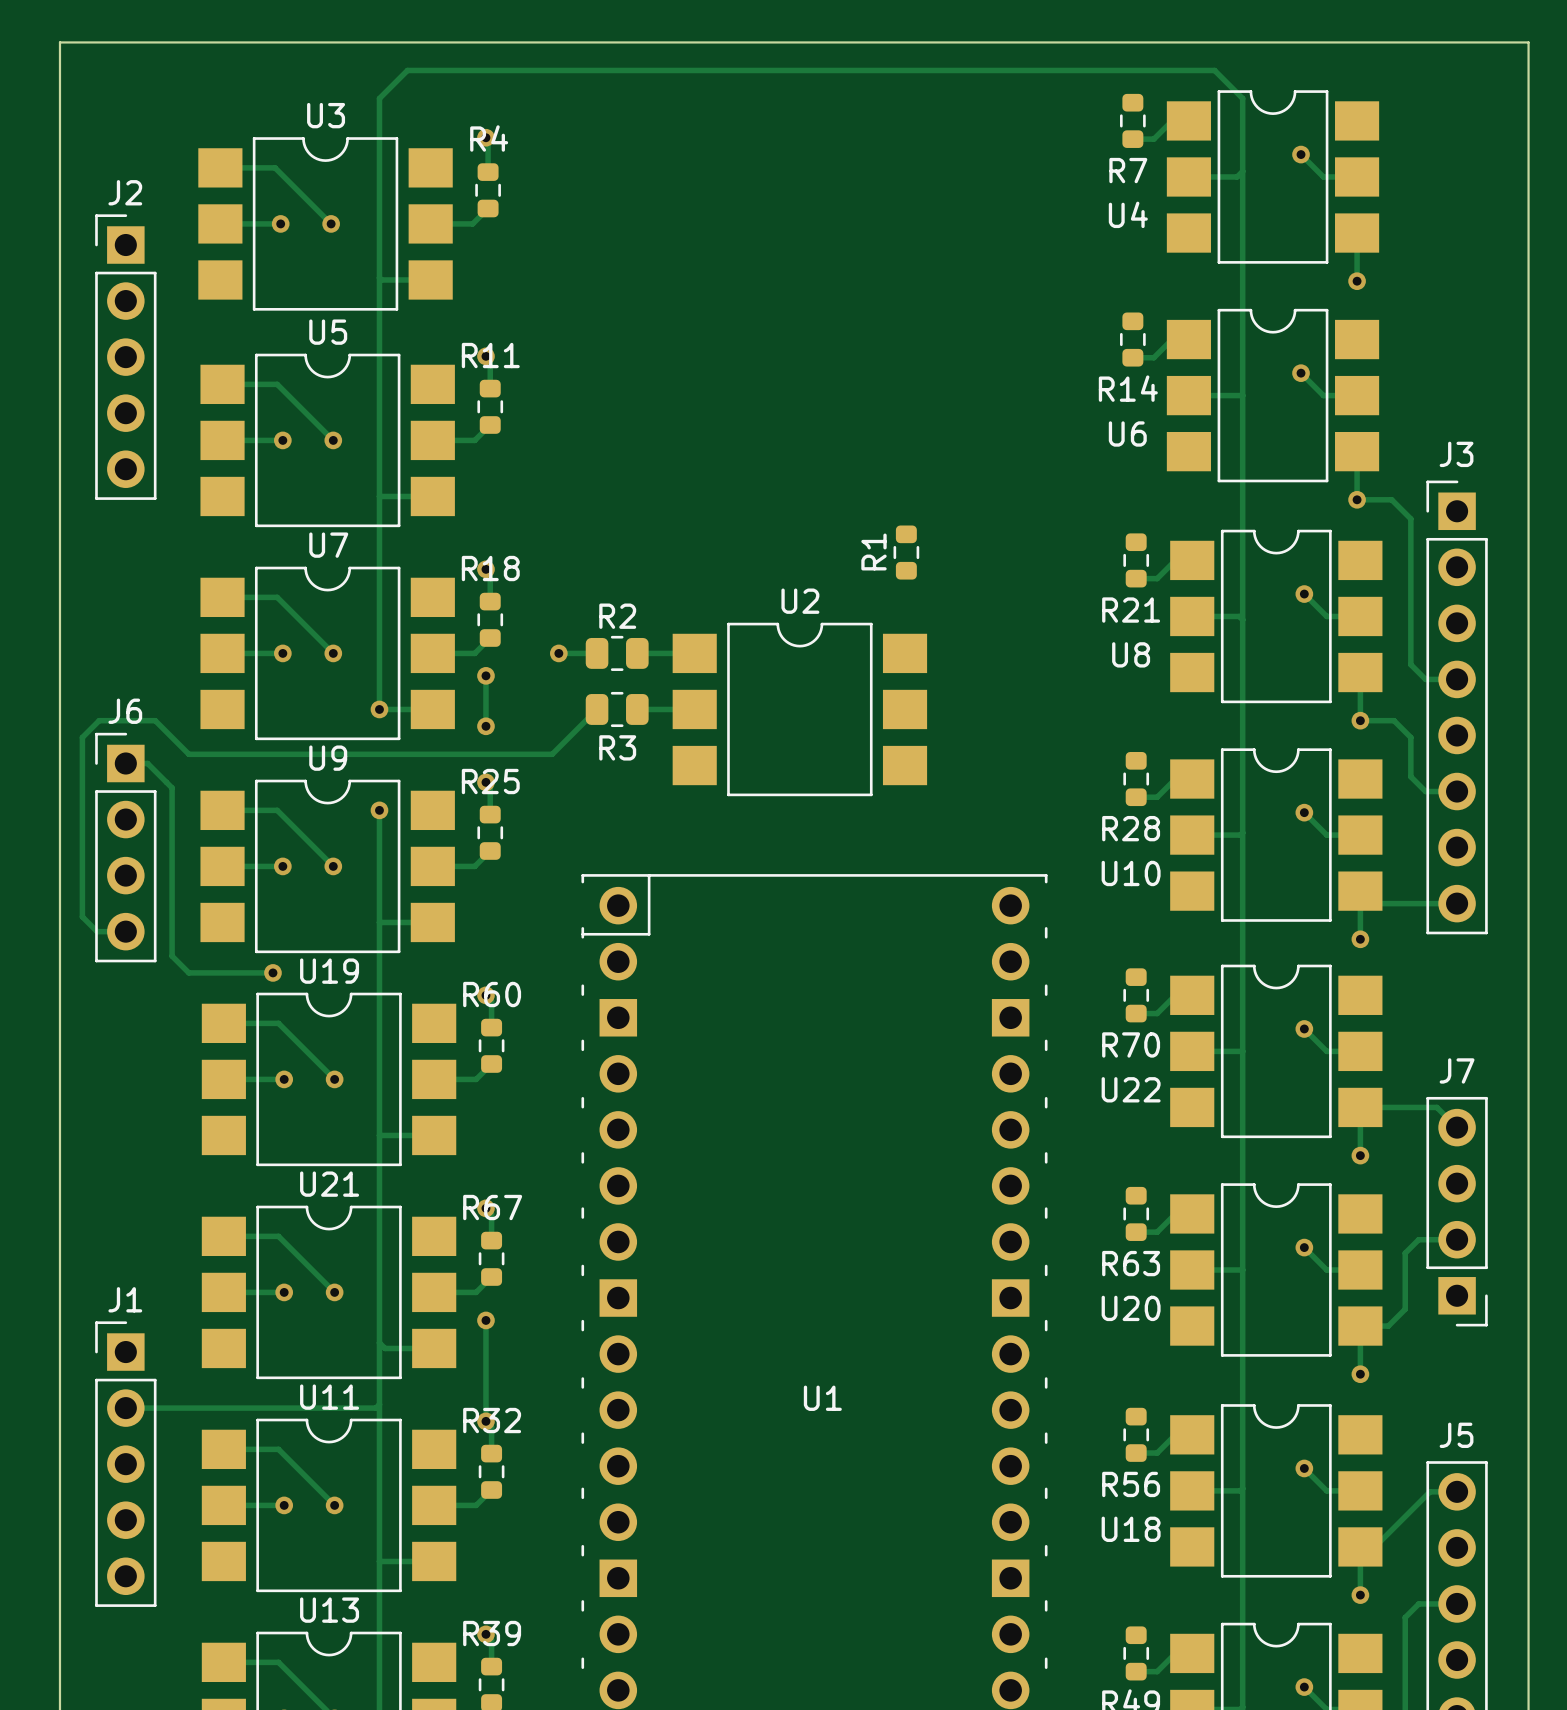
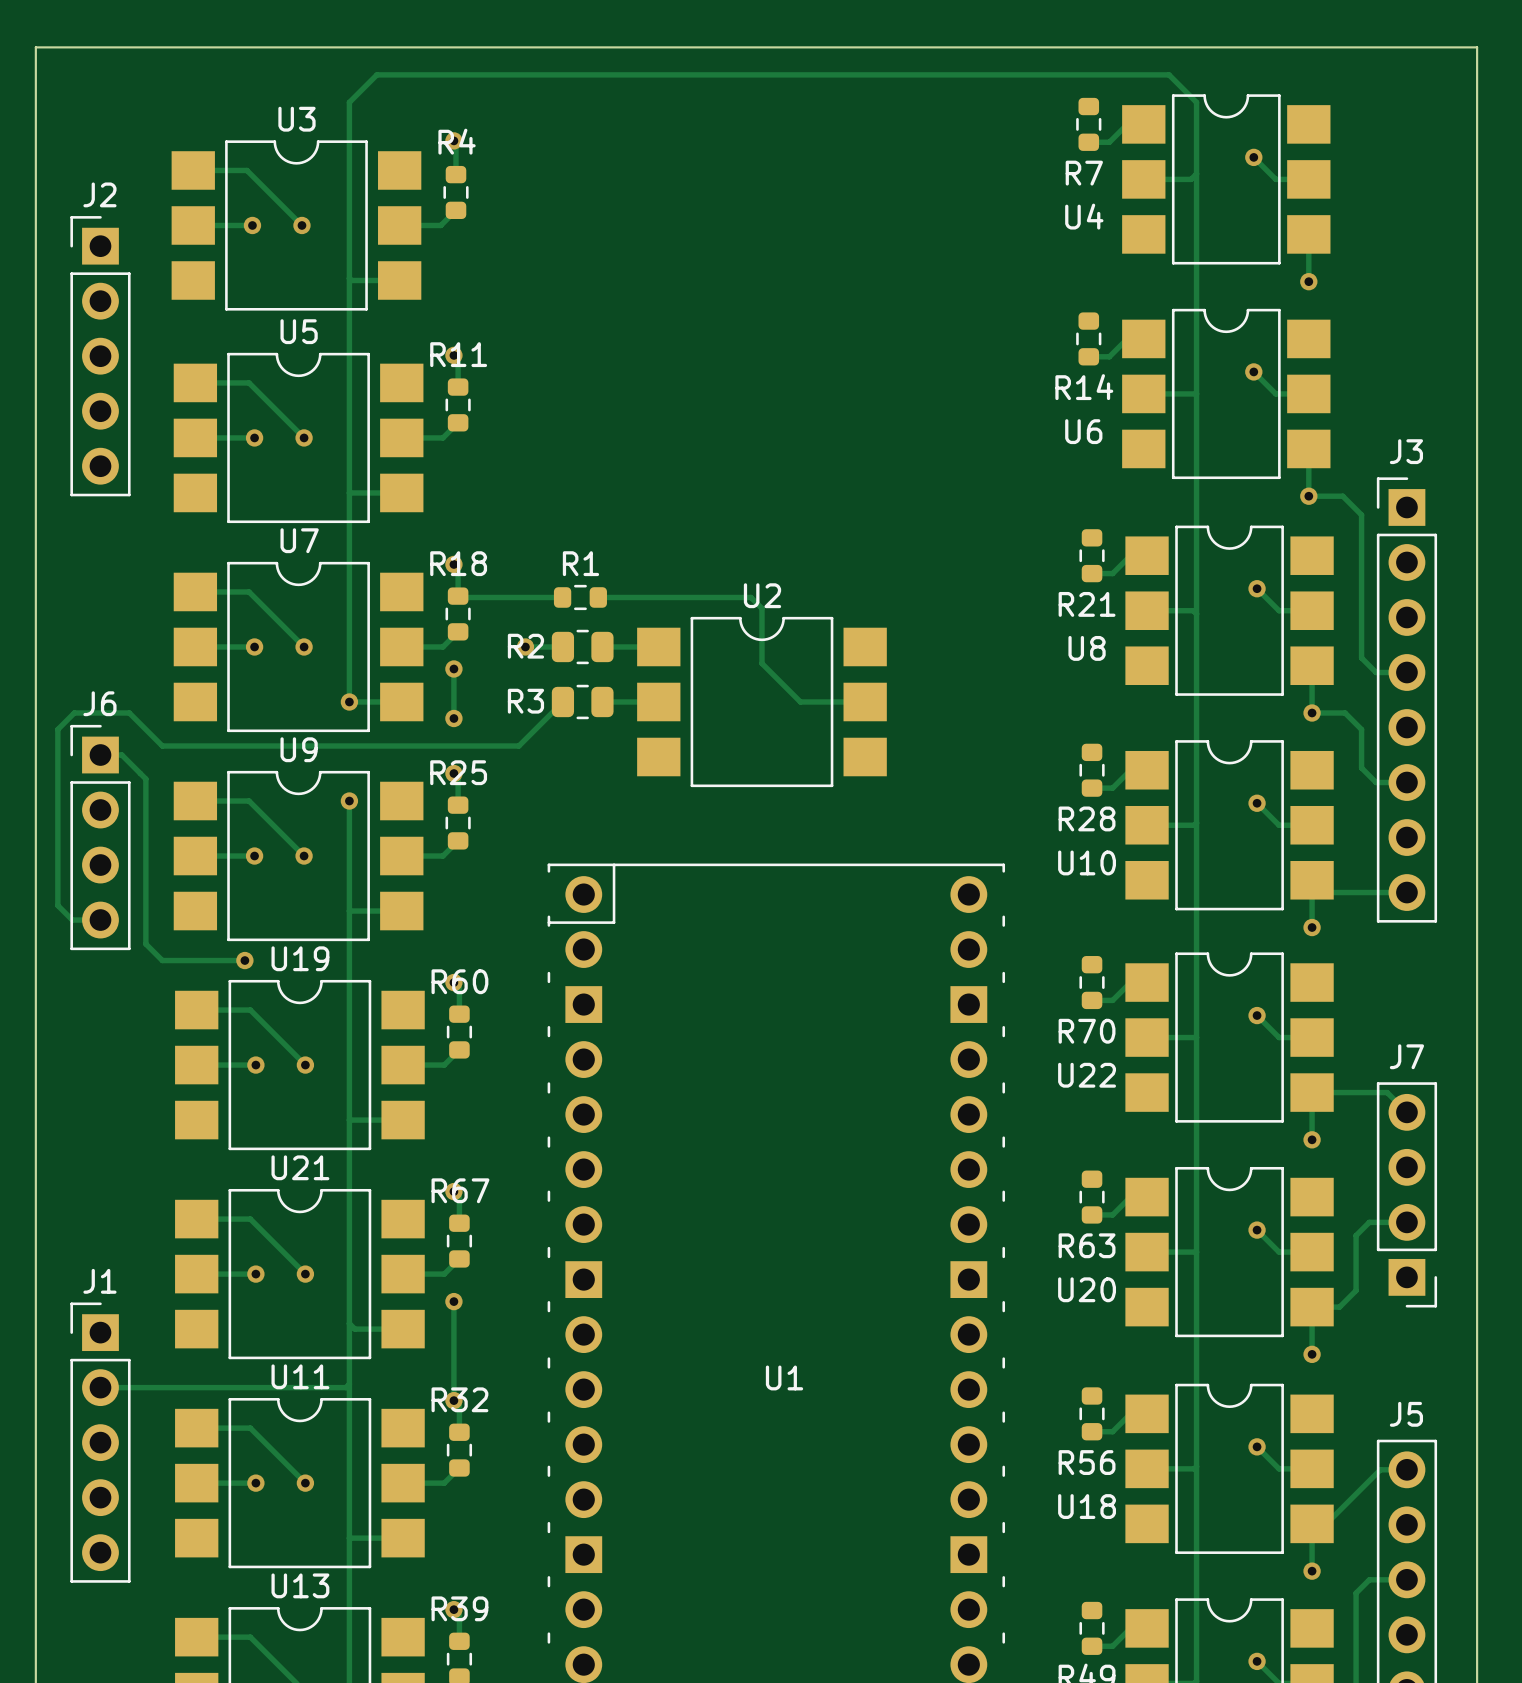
R1 rotation: 0° (906, 552) -> 90° clockwise (580, 597)
R1 position: (906, 552) -> (580, 597)
track: none -> (458, 596) (562, 597)
track: none -> (598, 597) (750, 597) (761, 608) (761, 663) (800, 701) (865, 701)
R2 name position: R2 (617, 616) -> R2 (525, 646)
R3 name position: R3 (617, 747) -> R3 (525, 701)

